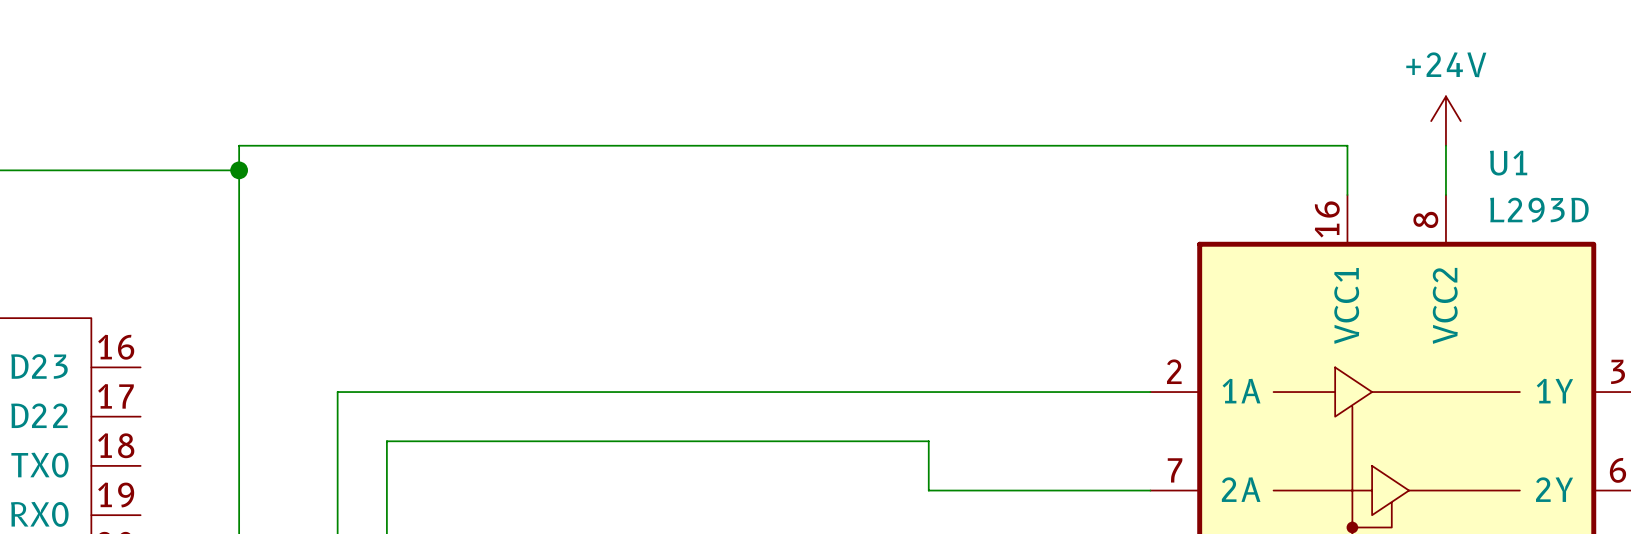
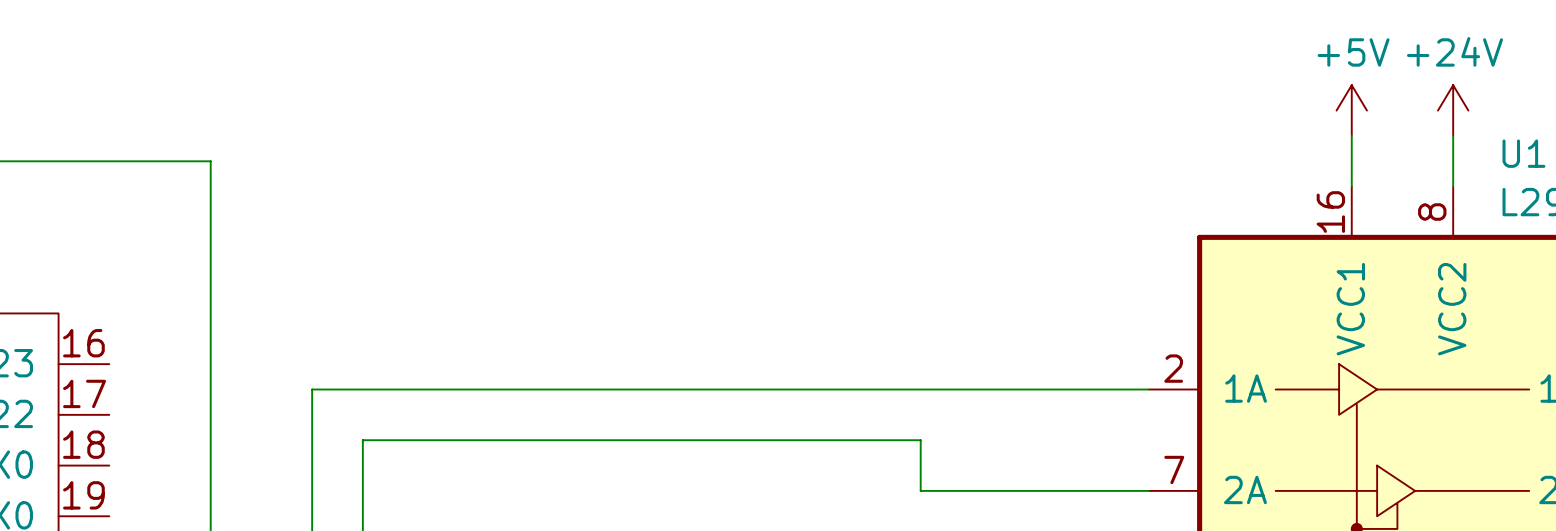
power symbol: none -> +5V (1351, 110)
wire: (1347, 145) (239, 145) (239, 170) -> none
junction: (239, 170) -> none

